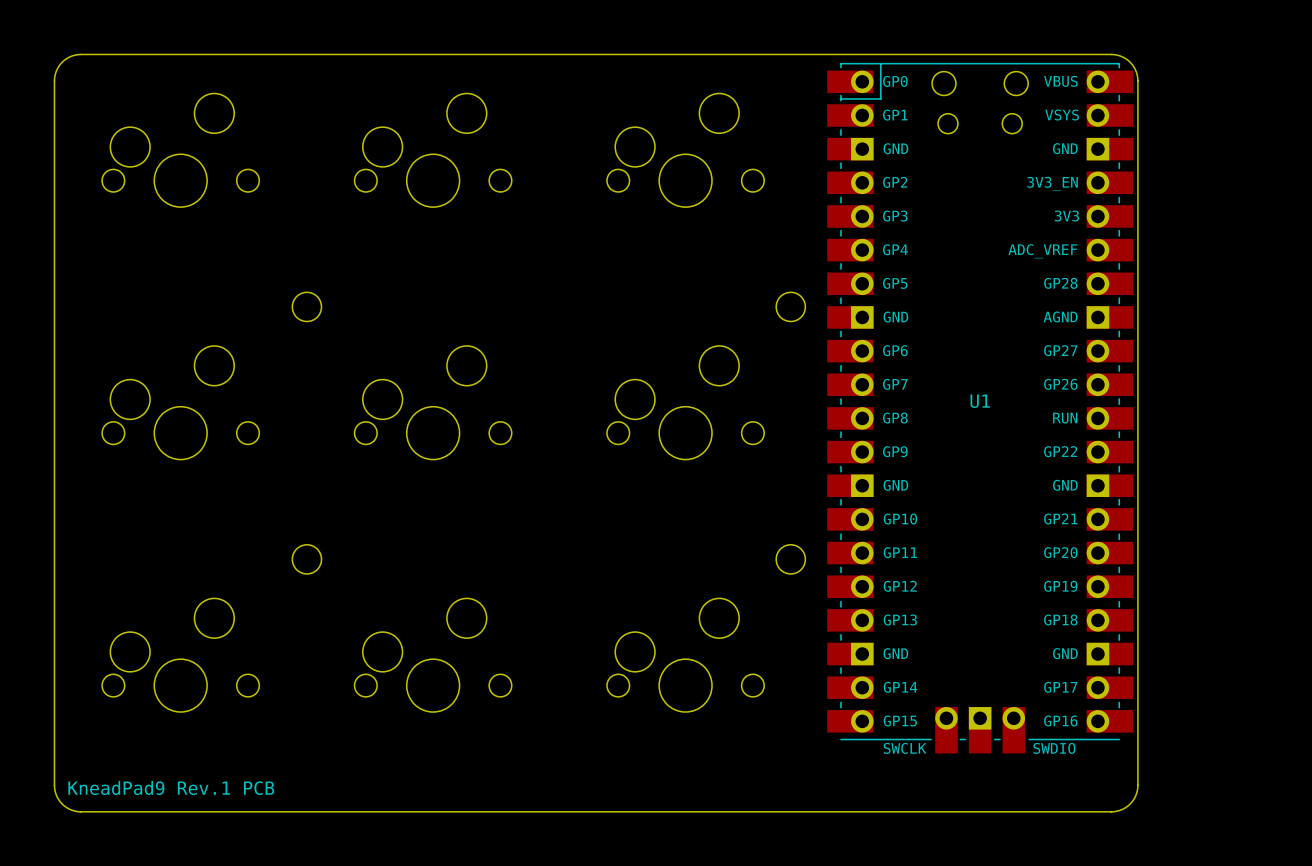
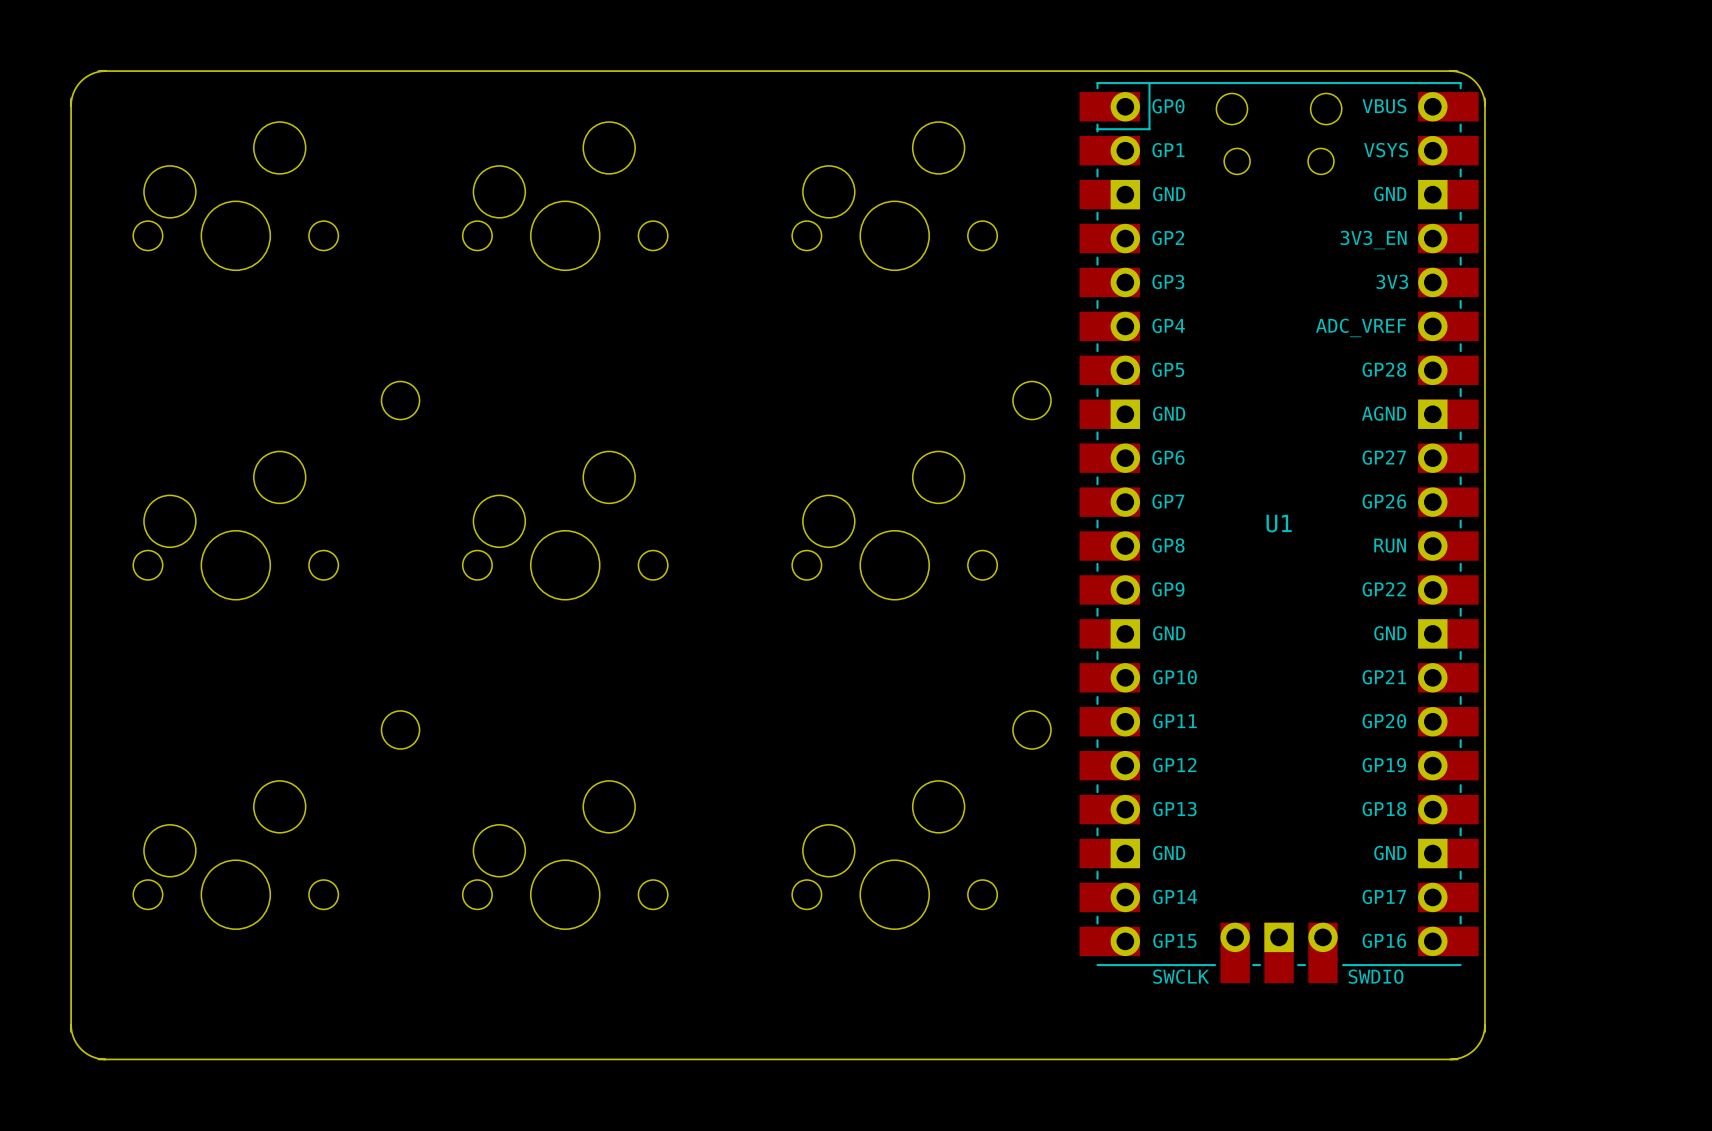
text: KneadPad9 Rev.1 PCB (171, 787) -> none

